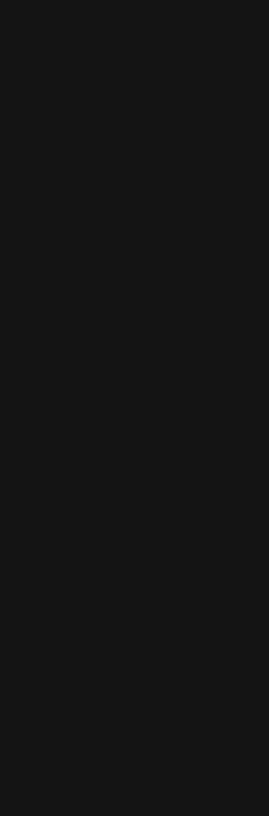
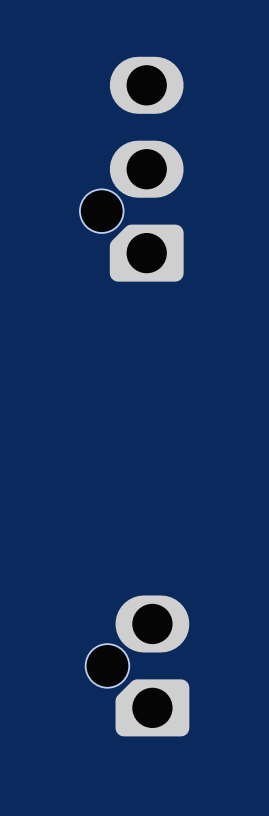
part: none -> (131, 169)
part: none -> (137, 665)

